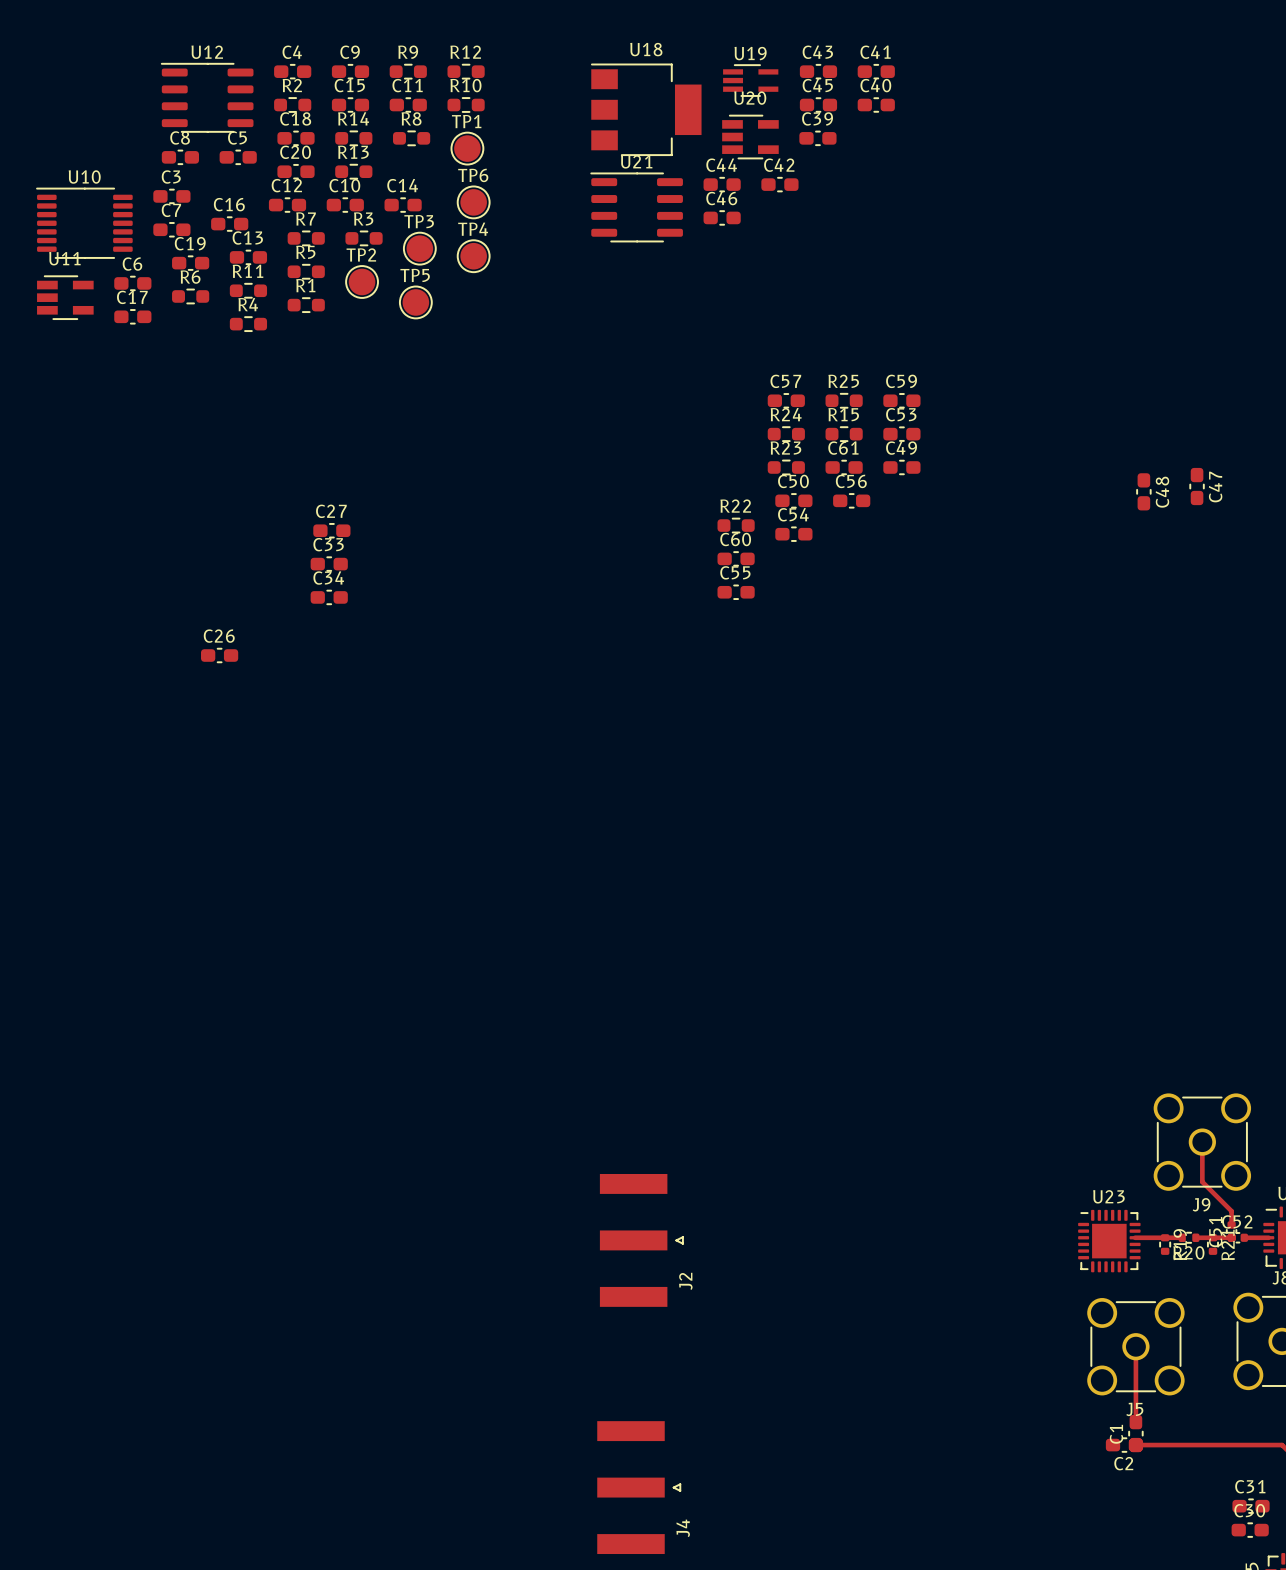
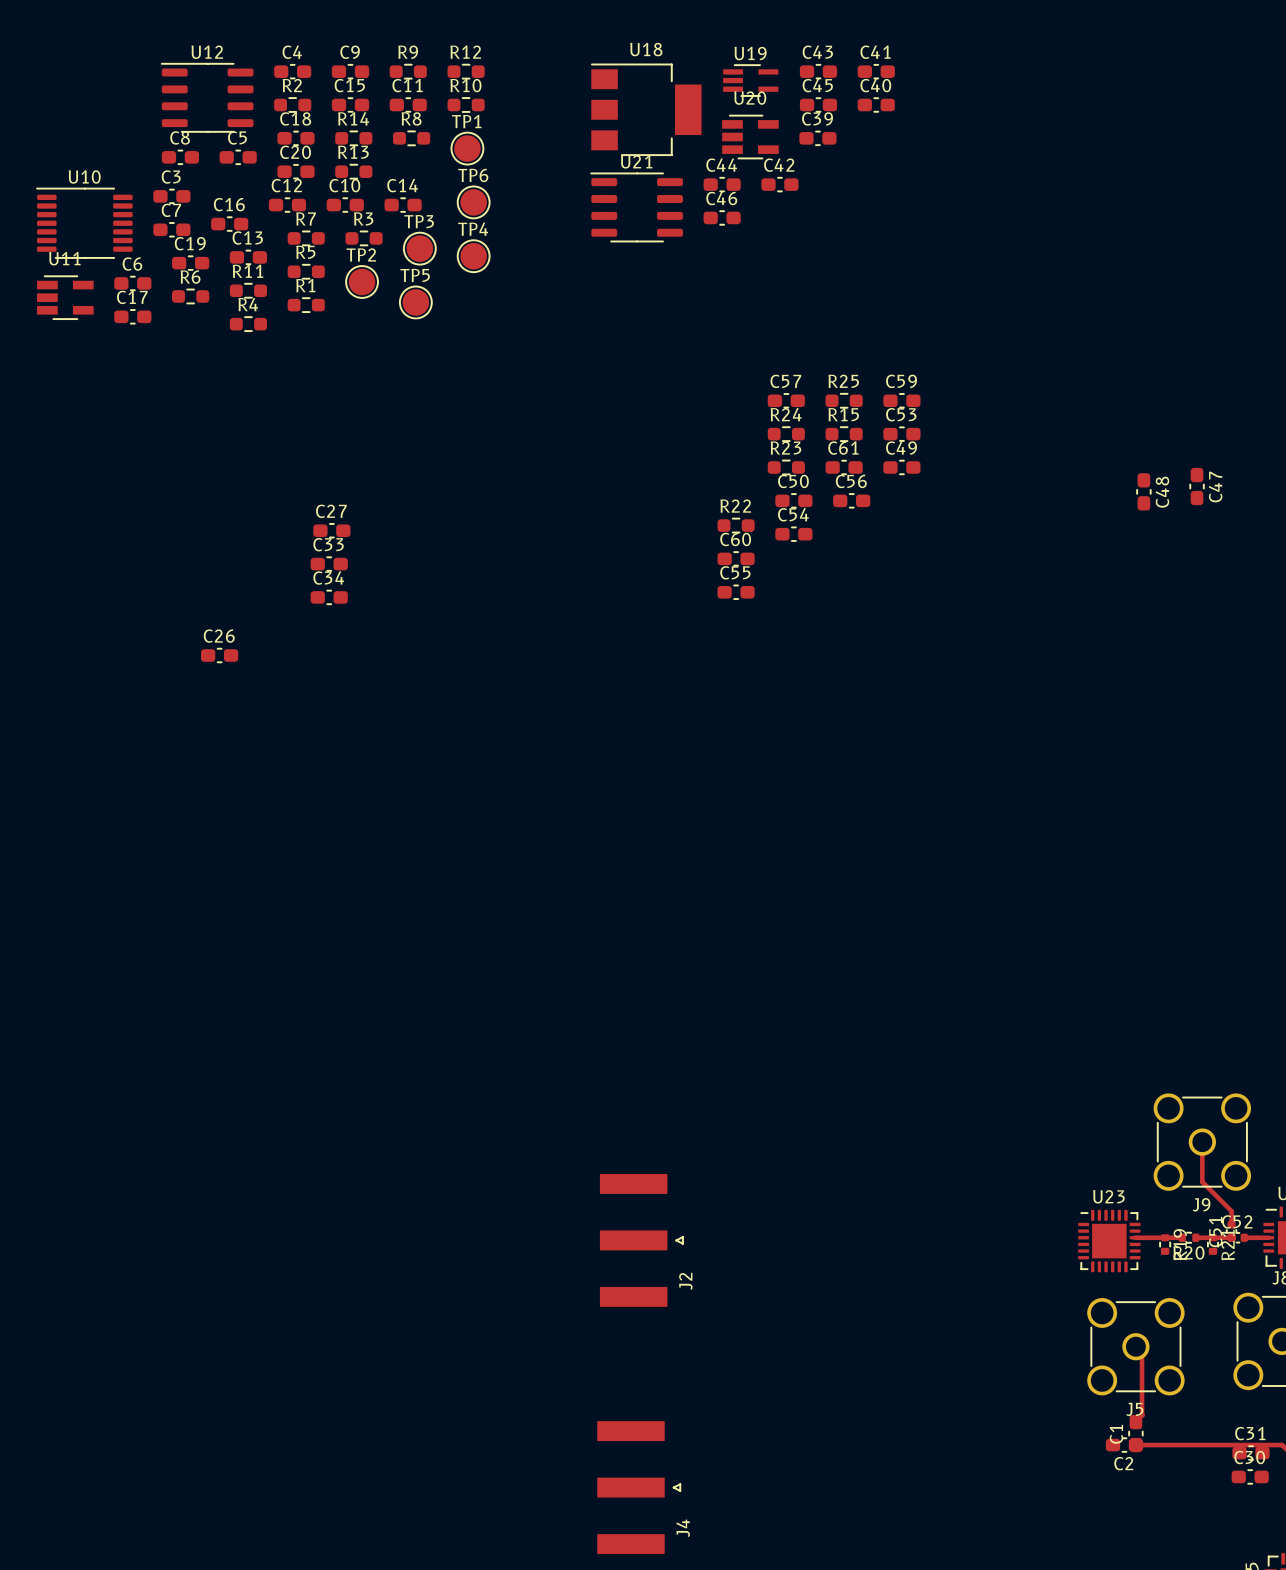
track: none -> (1142, 1344) (1142, 1415)
track: (1135, 1346) (1135, 1422) -> none
C31 position: (1251, 1506) -> (1251, 1453)
C30 position: (1250, 1530) -> (1250, 1476)

